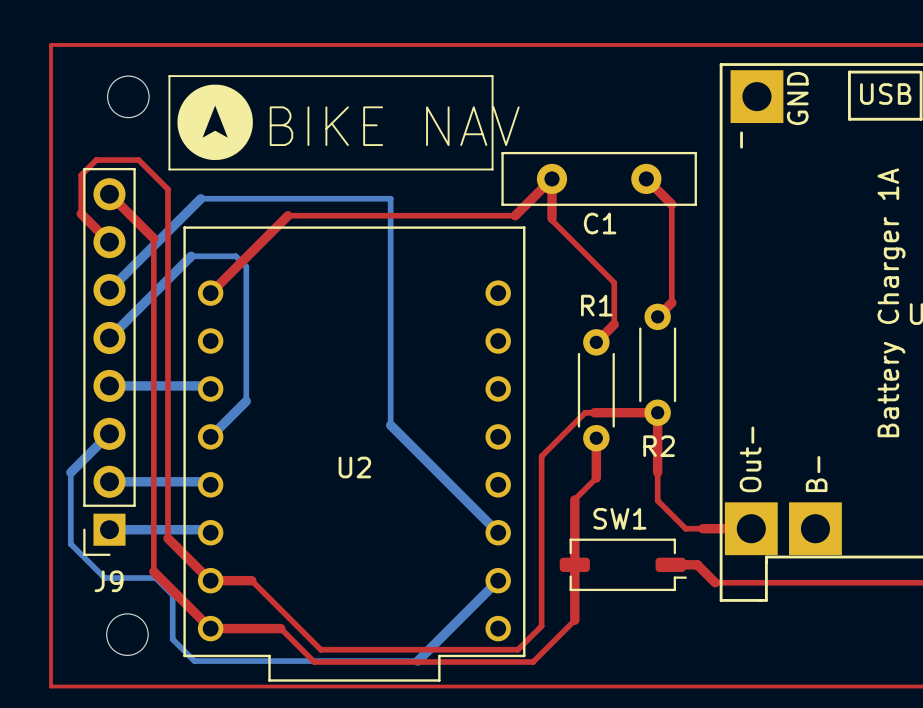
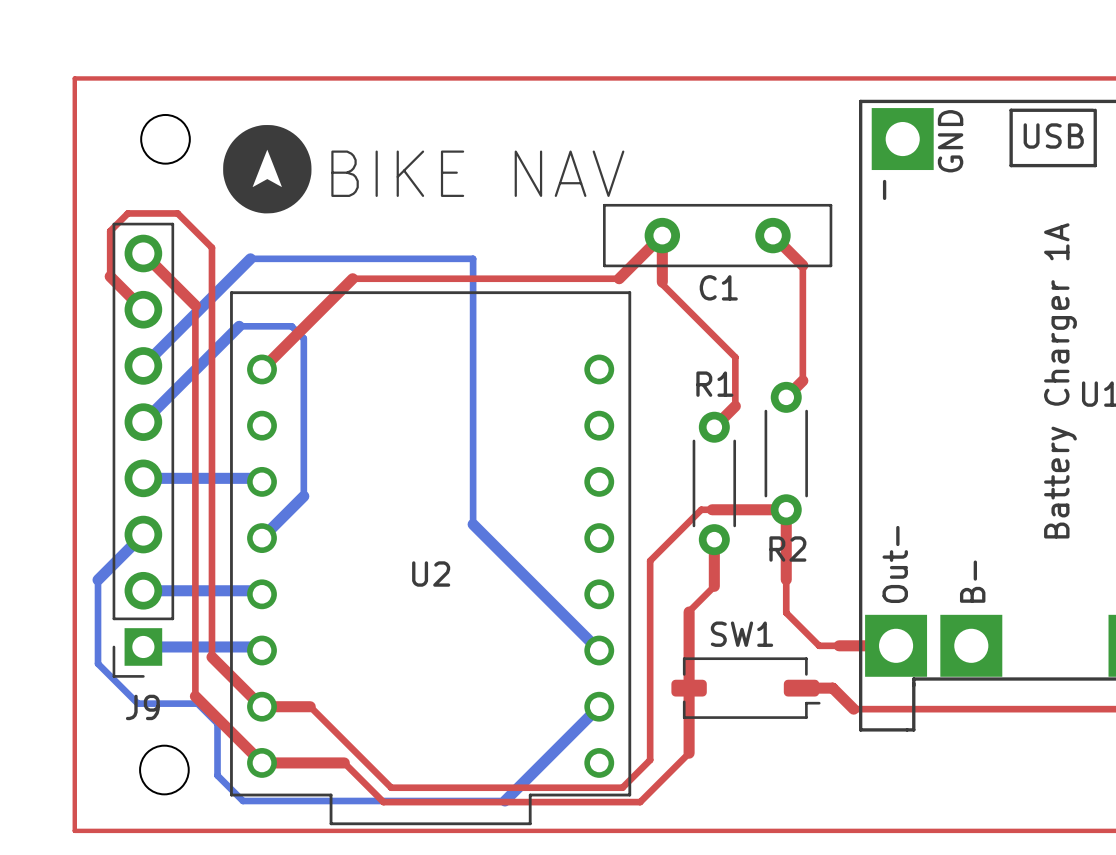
line: (169, 76) (492, 76) (492, 169) (169, 169) (169, 76) -> none

